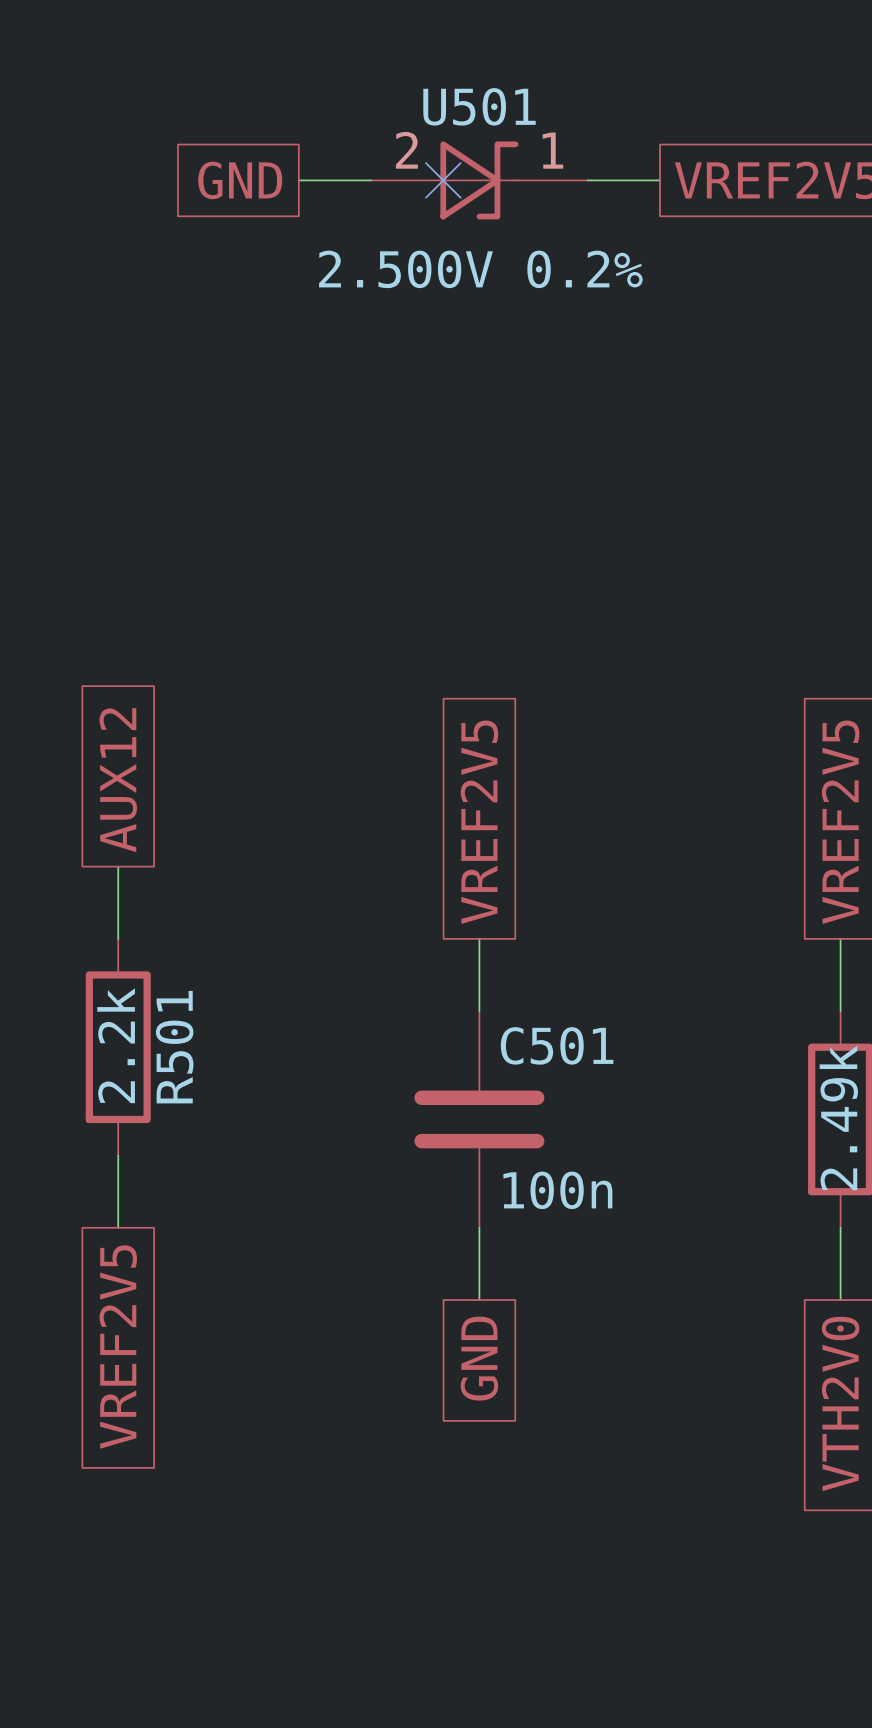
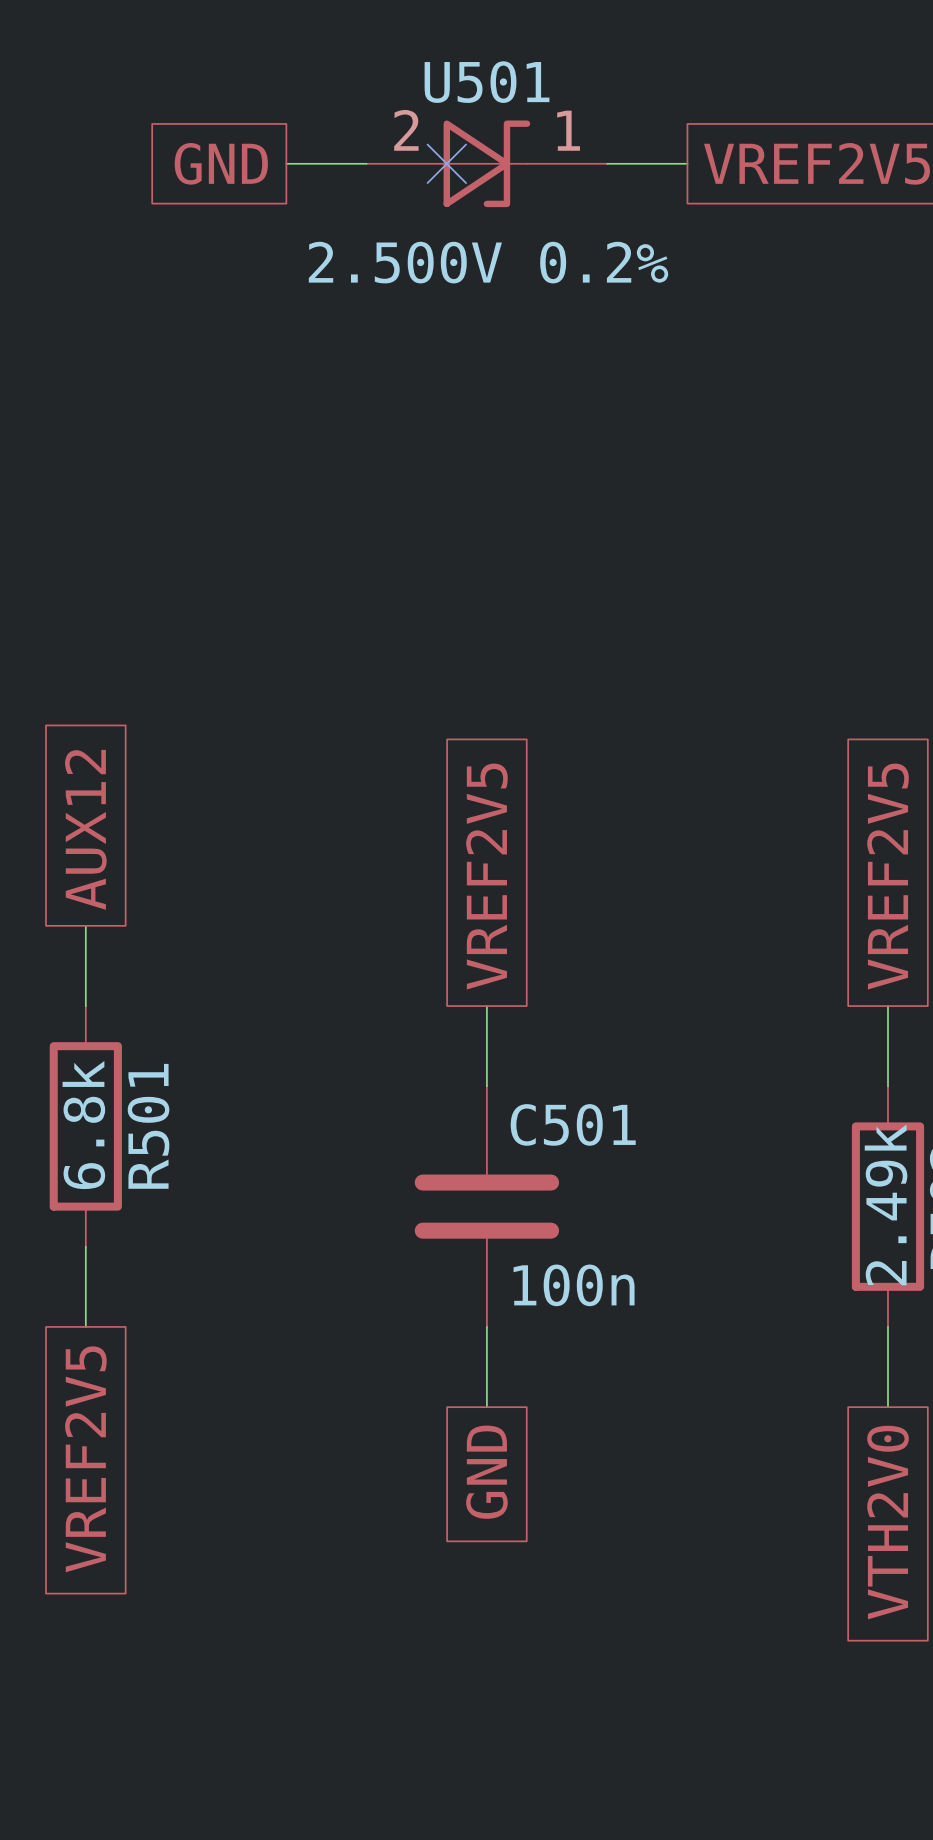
R501 value: 2.2k (116, 1045) -> 6.8k (83, 1125)

